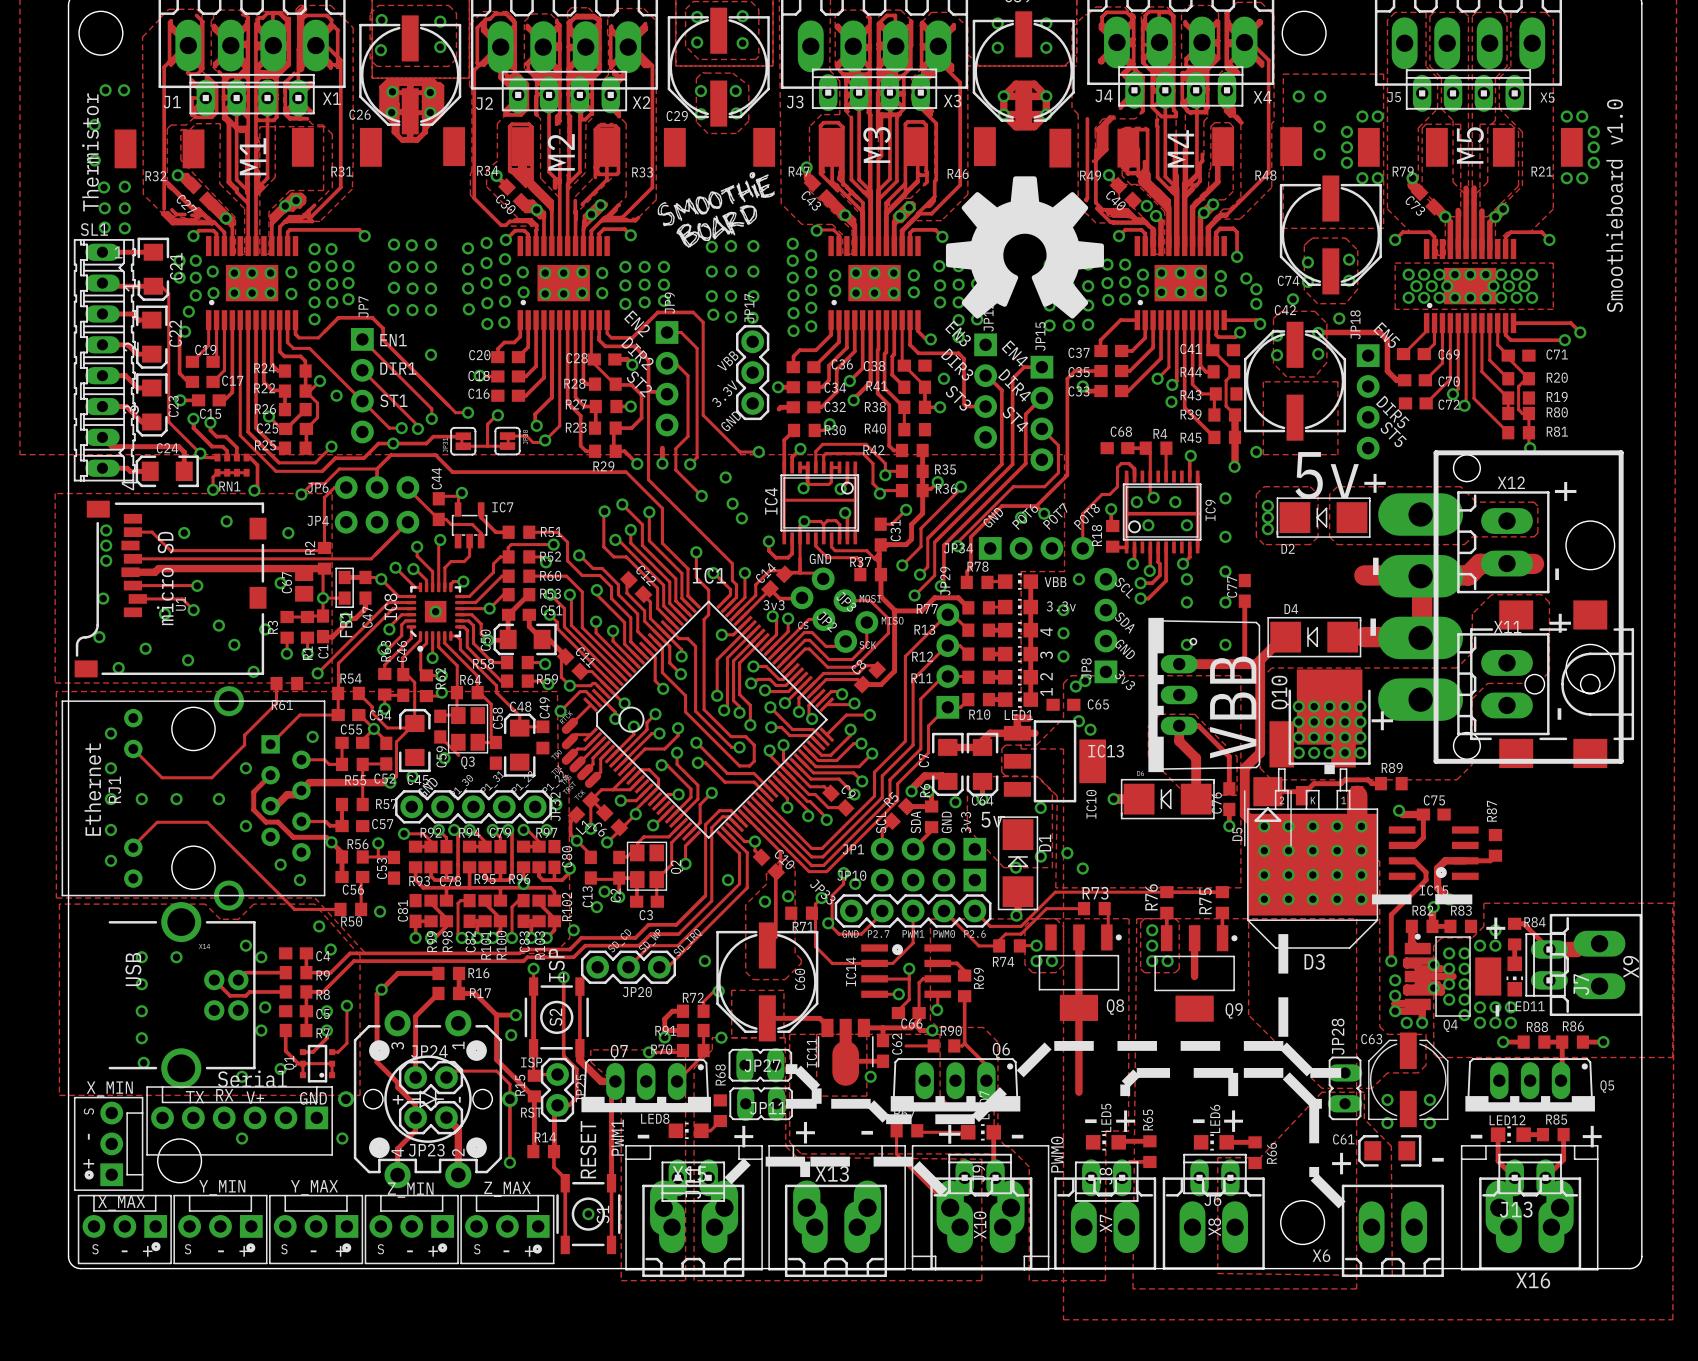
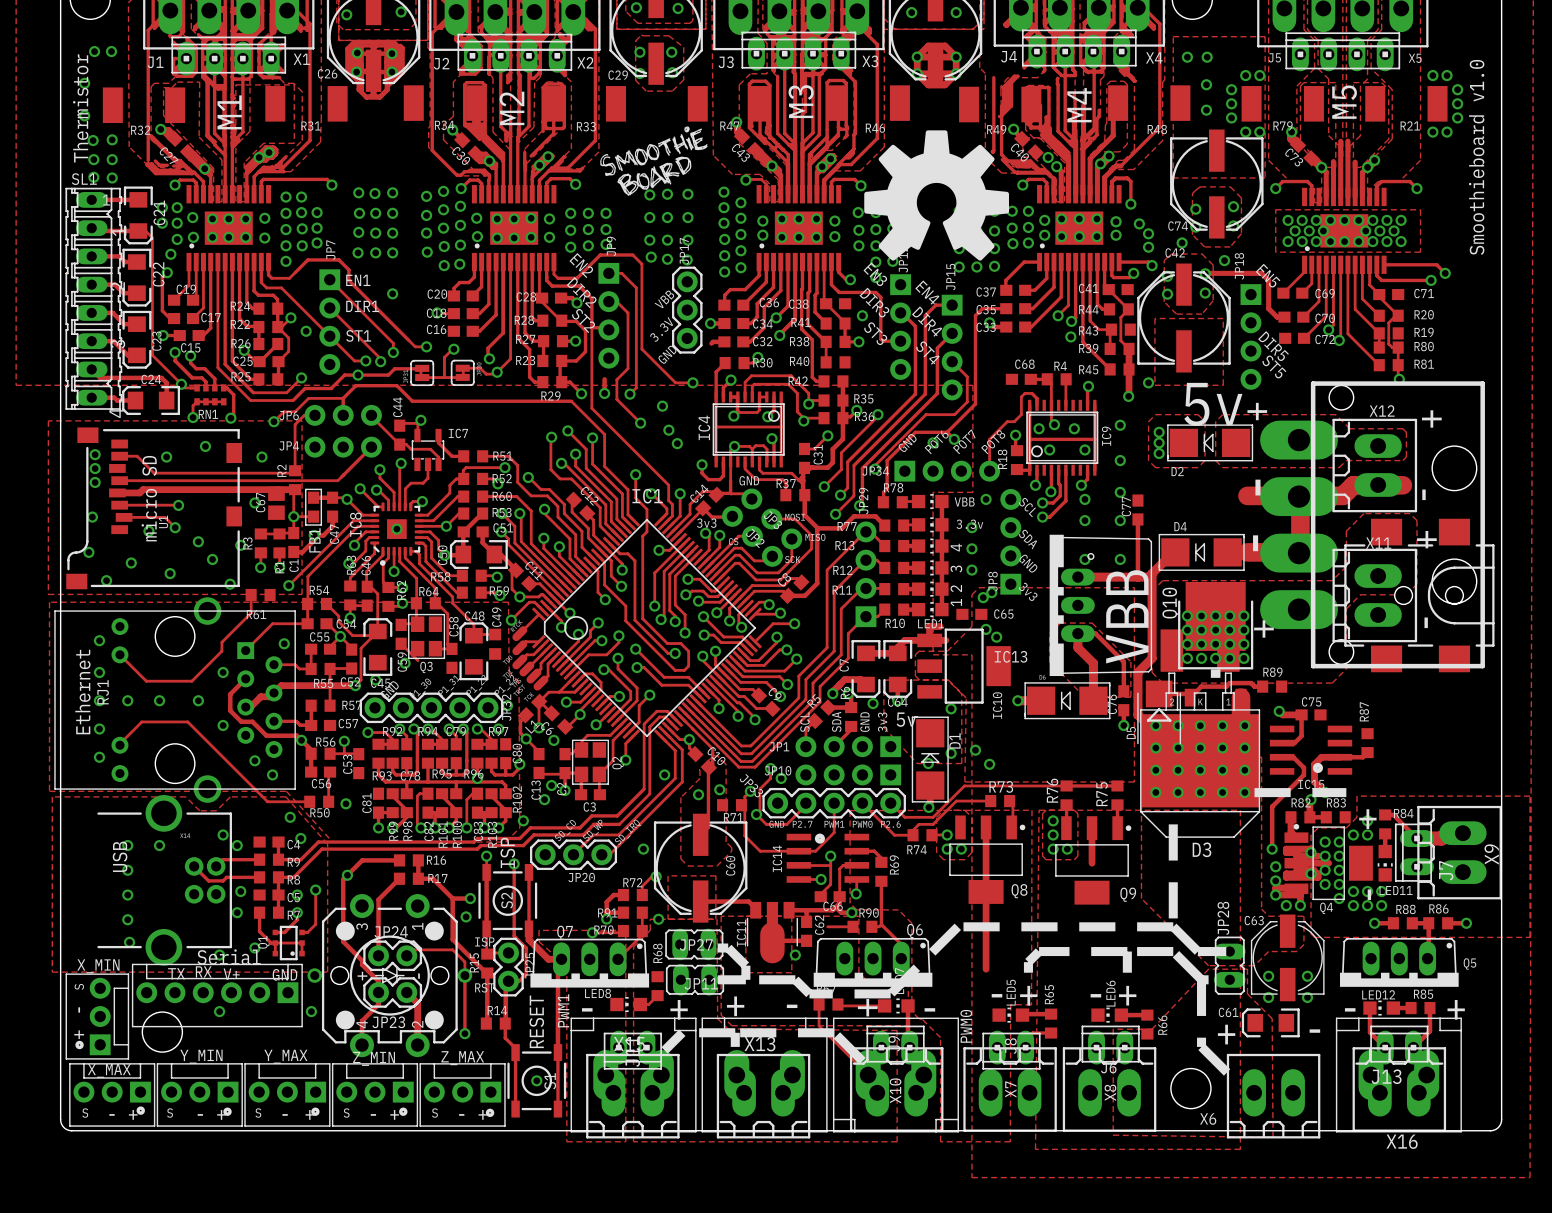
track: (620, 829) (607, 842) -> none

